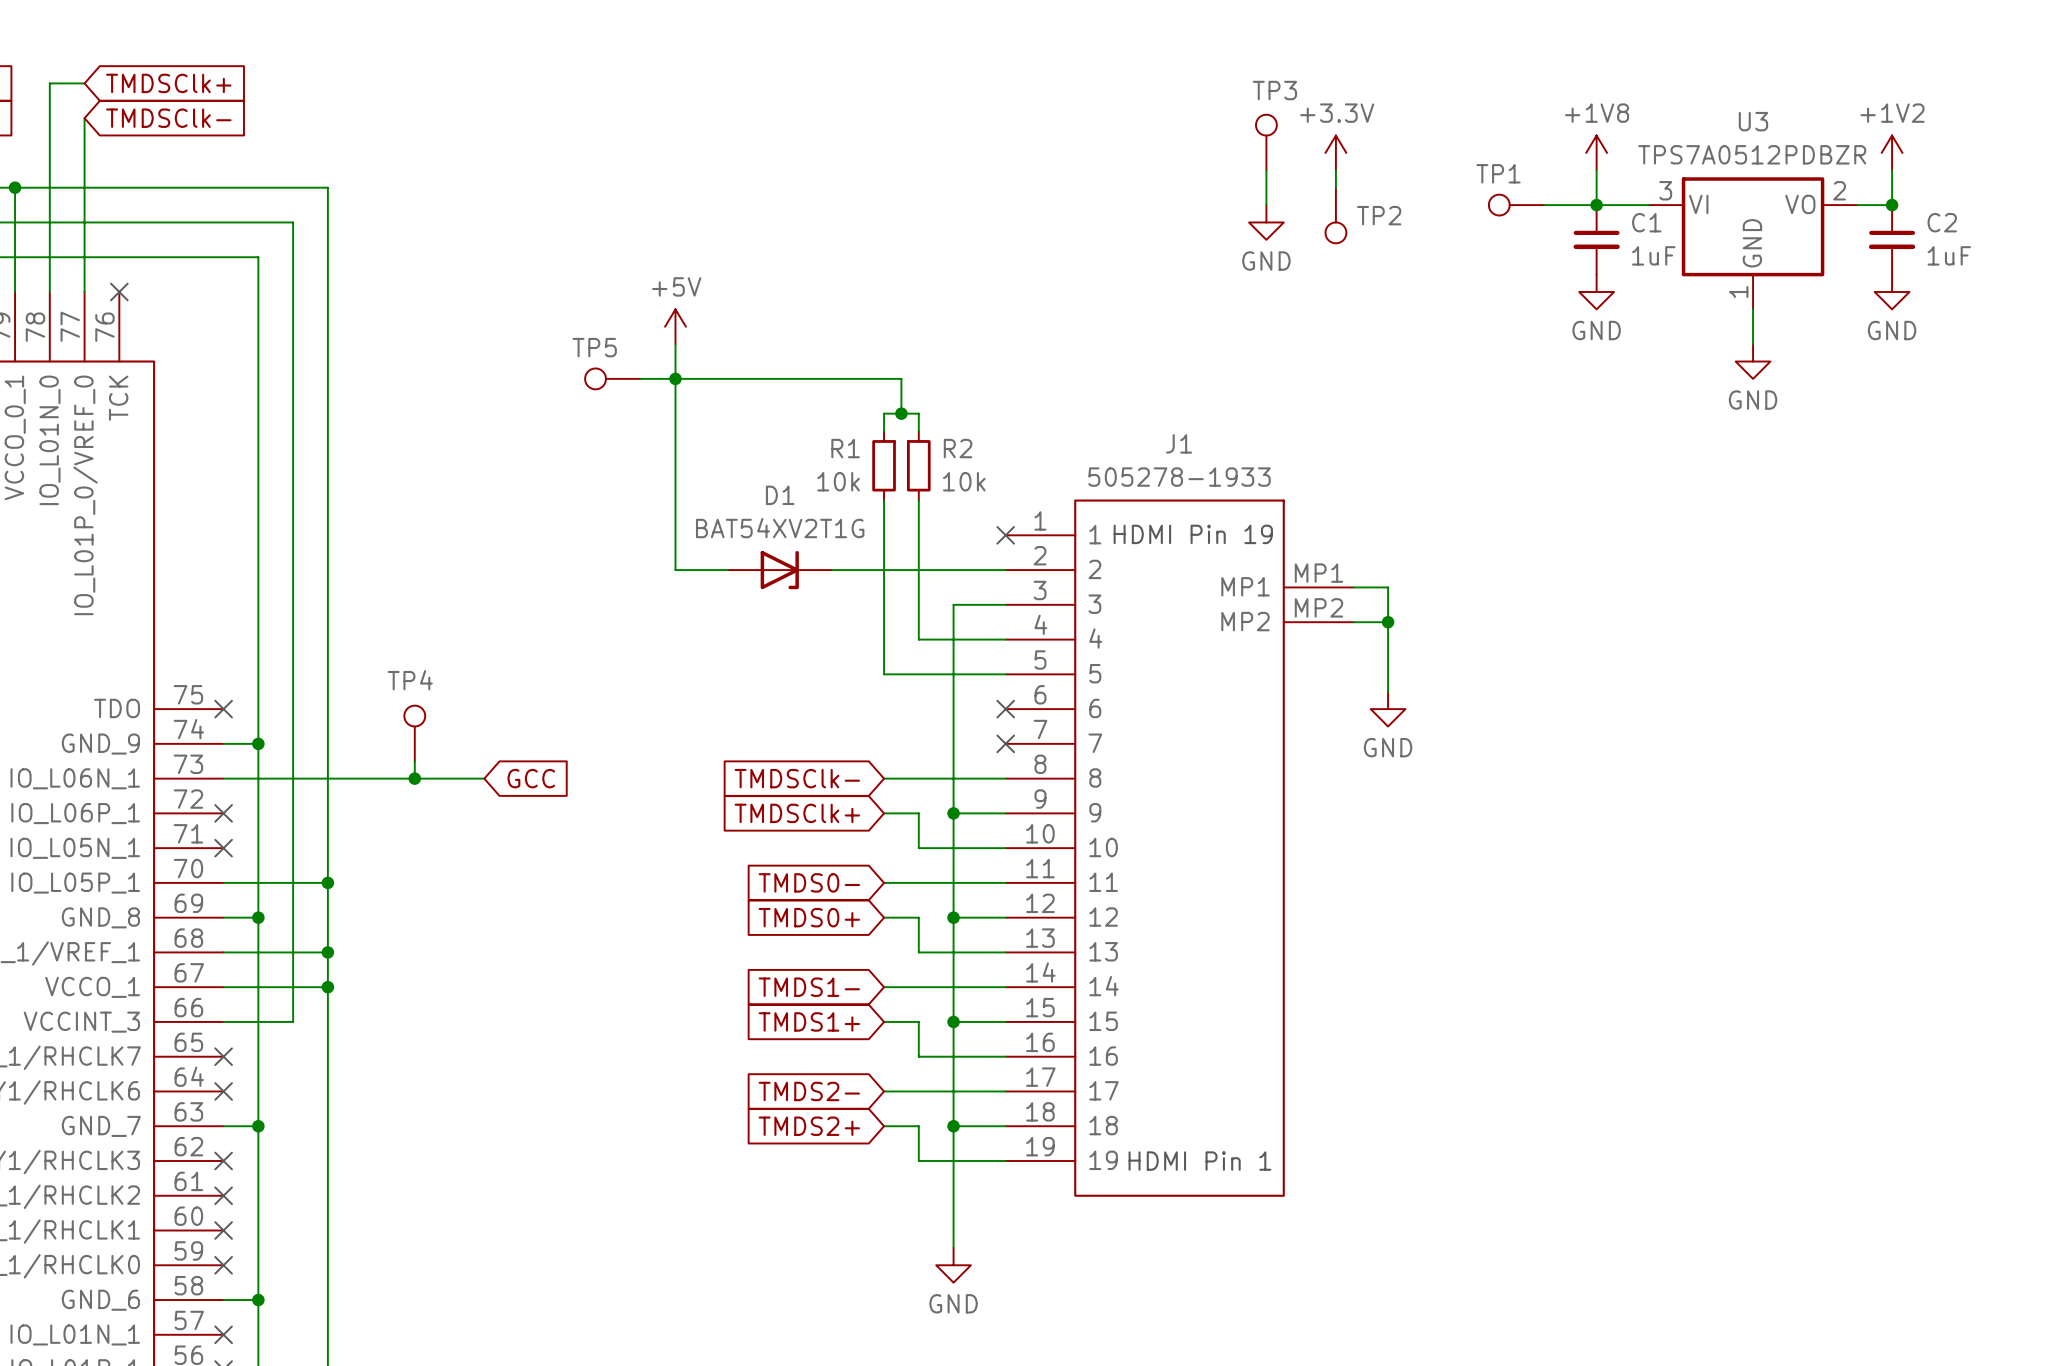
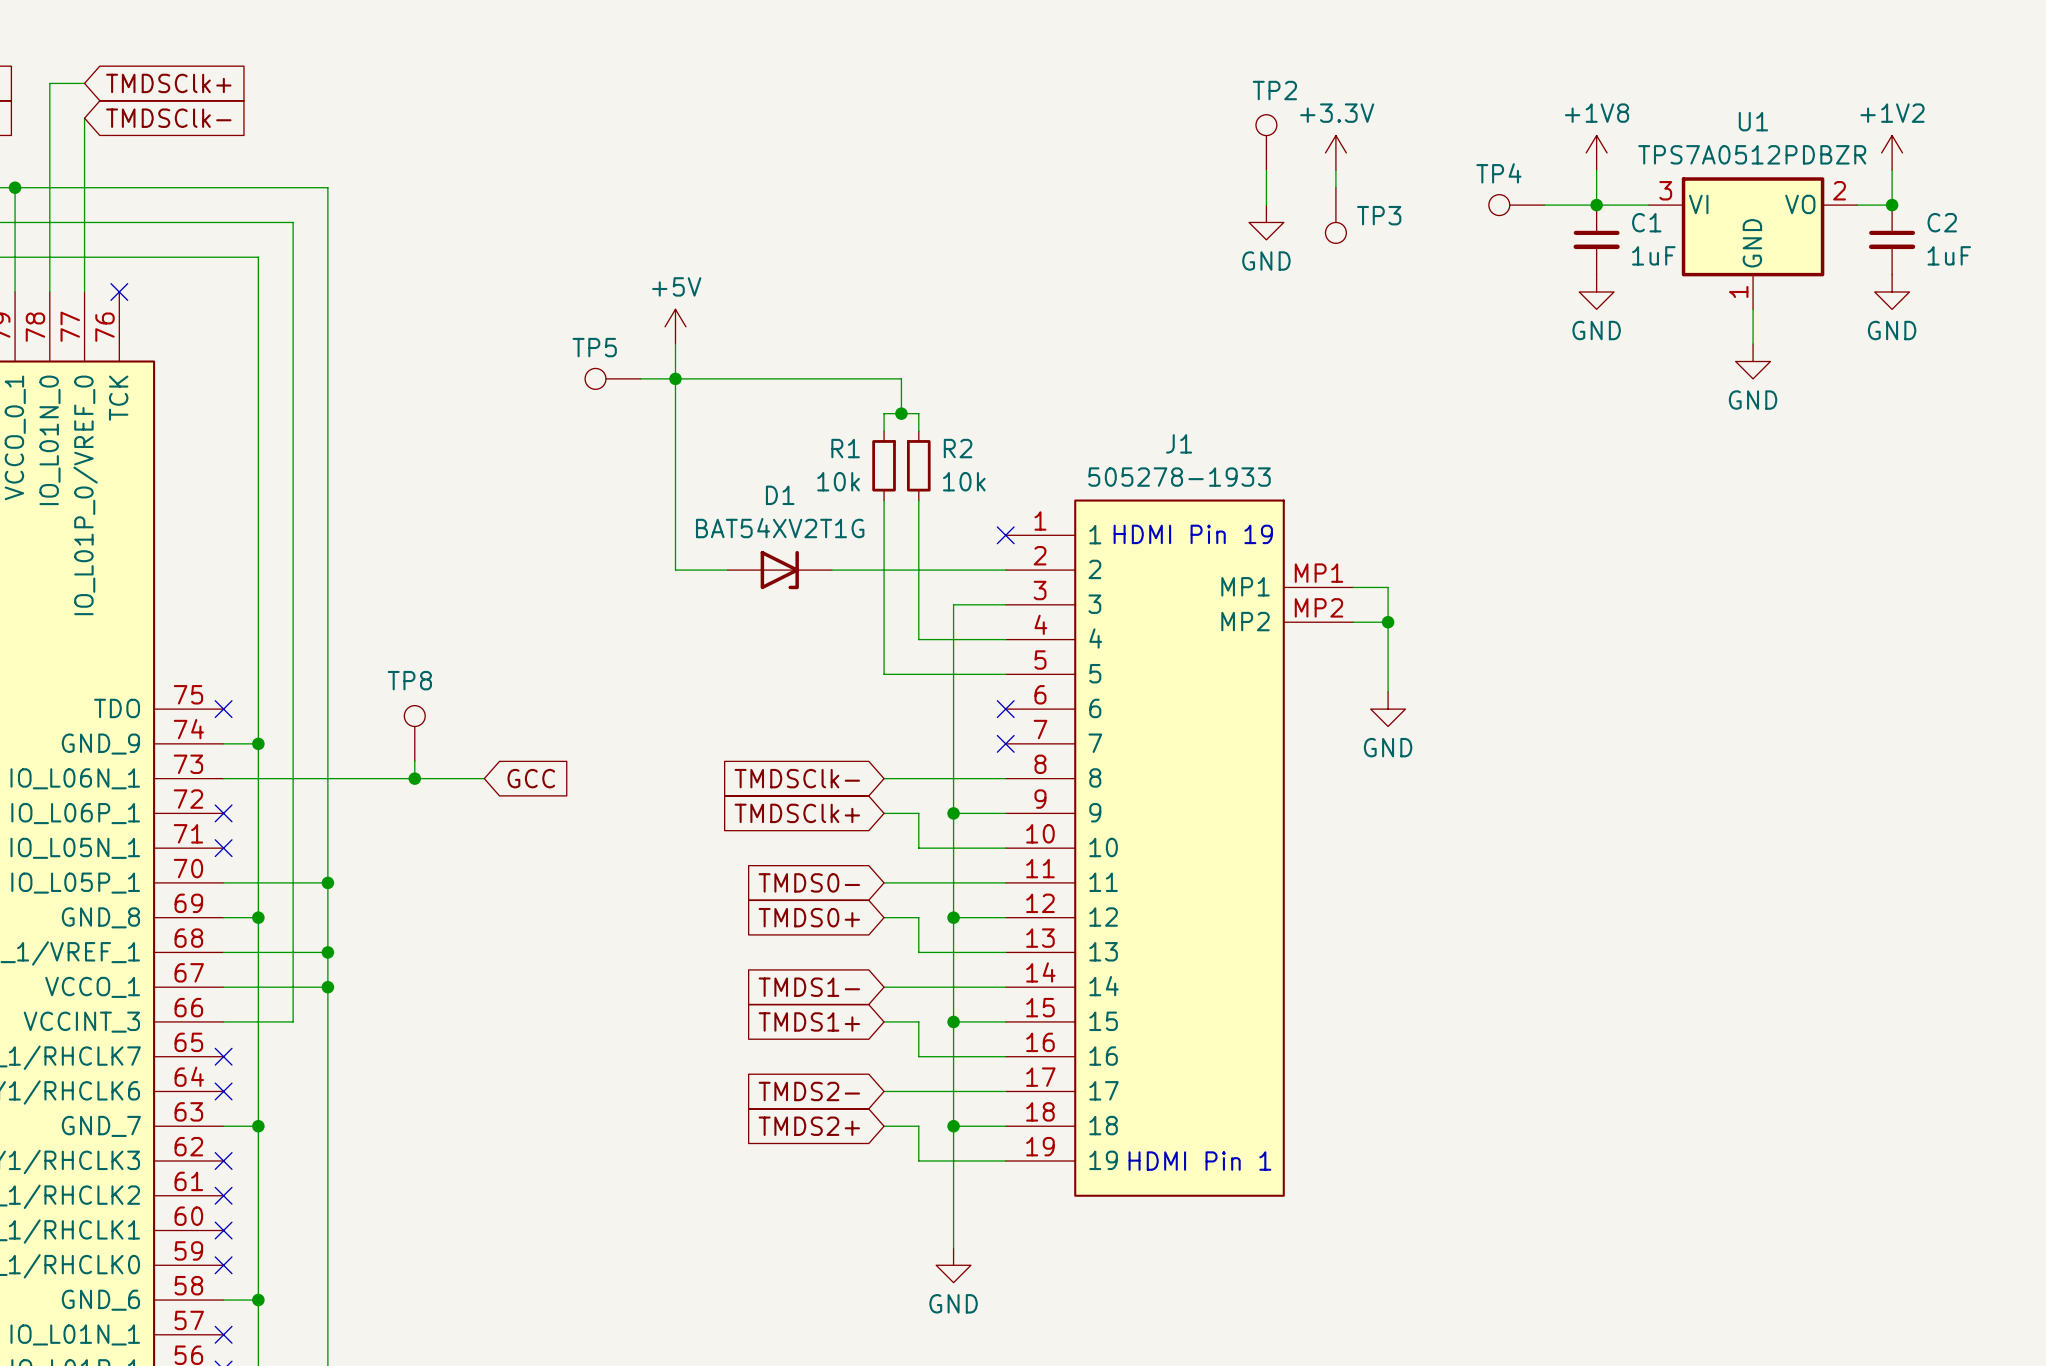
TP3 name: TP3 (1274, 90) -> TP2 (1274, 90)
U3 name: U3 (1753, 121) -> U1 (1753, 121)
TP1 name: TP1 (1498, 173) -> TP4 (1498, 173)
TP2 name: TP2 (1379, 215) -> TP3 (1379, 215)
TP4 name: TP4 (410, 680) -> TP8 (409, 680)

